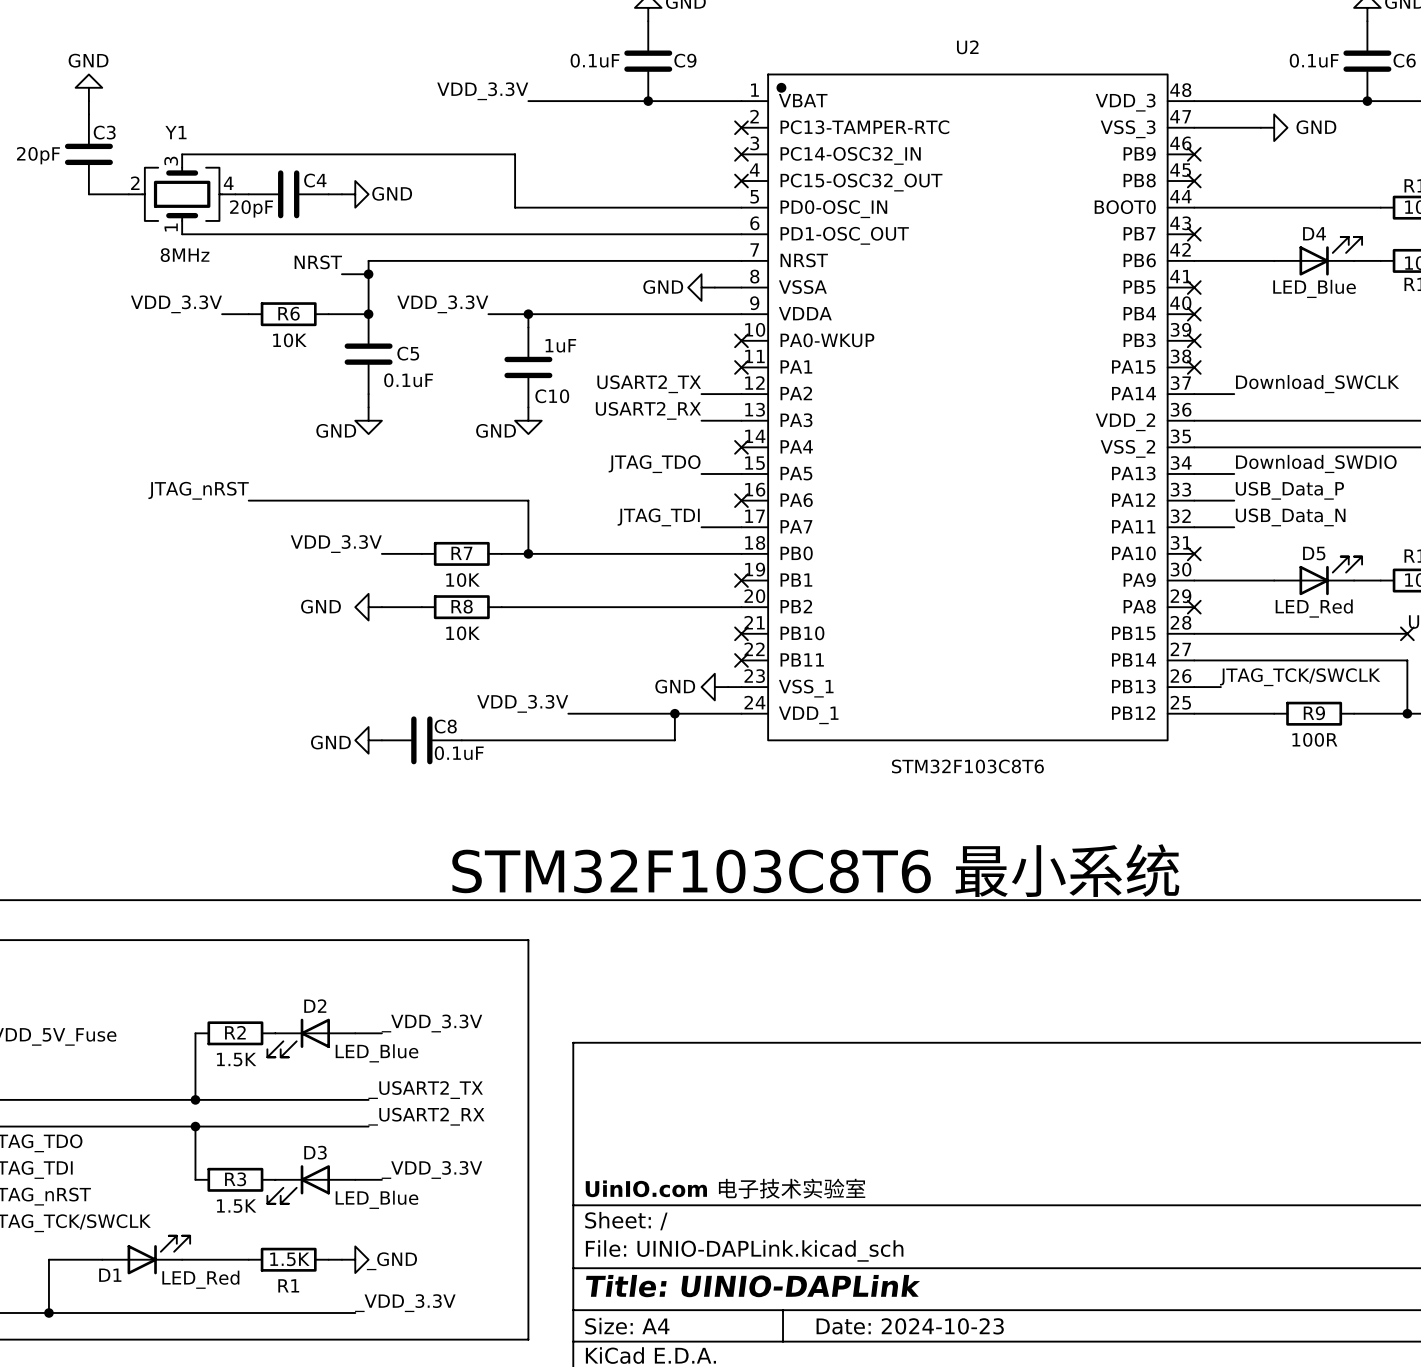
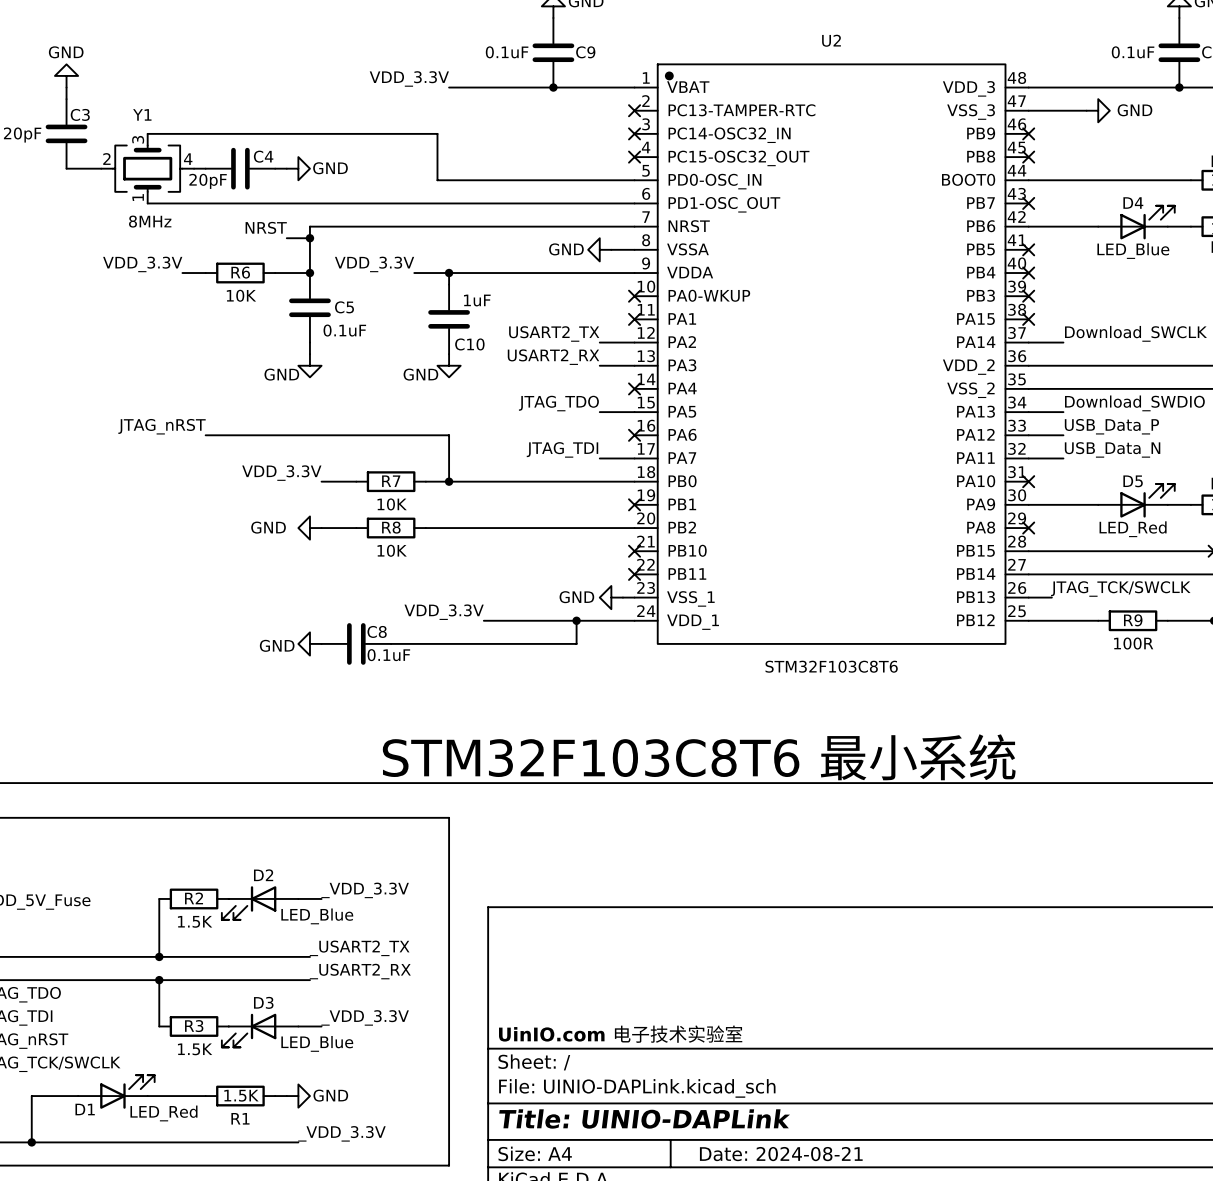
power symbol: _GND (355, 1259) -> GND (298, 1096)
title block: Date: 2024-10-23 (910, 1326) -> Date: 2024-08-21 (781, 1154)

